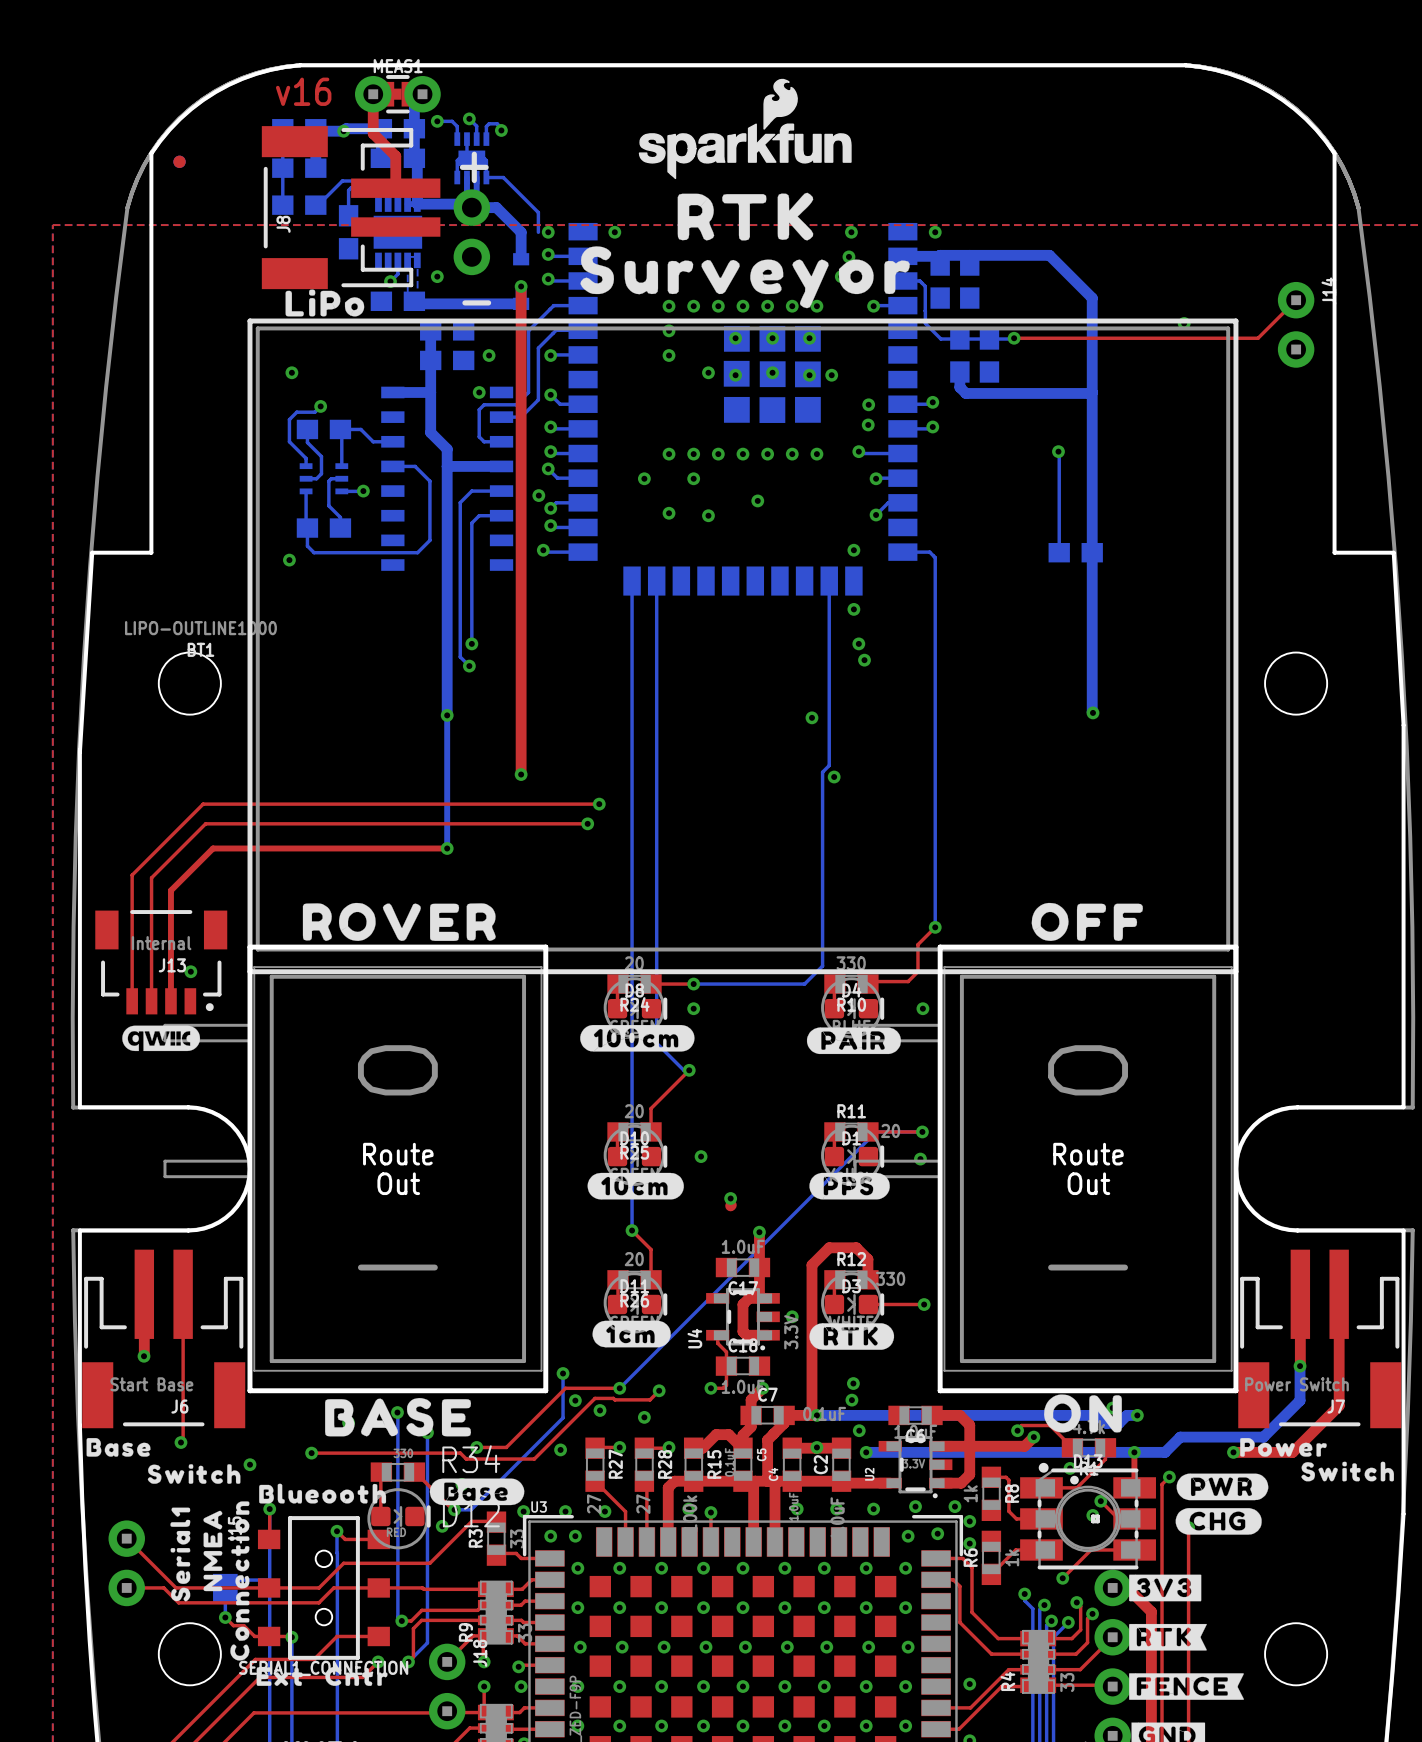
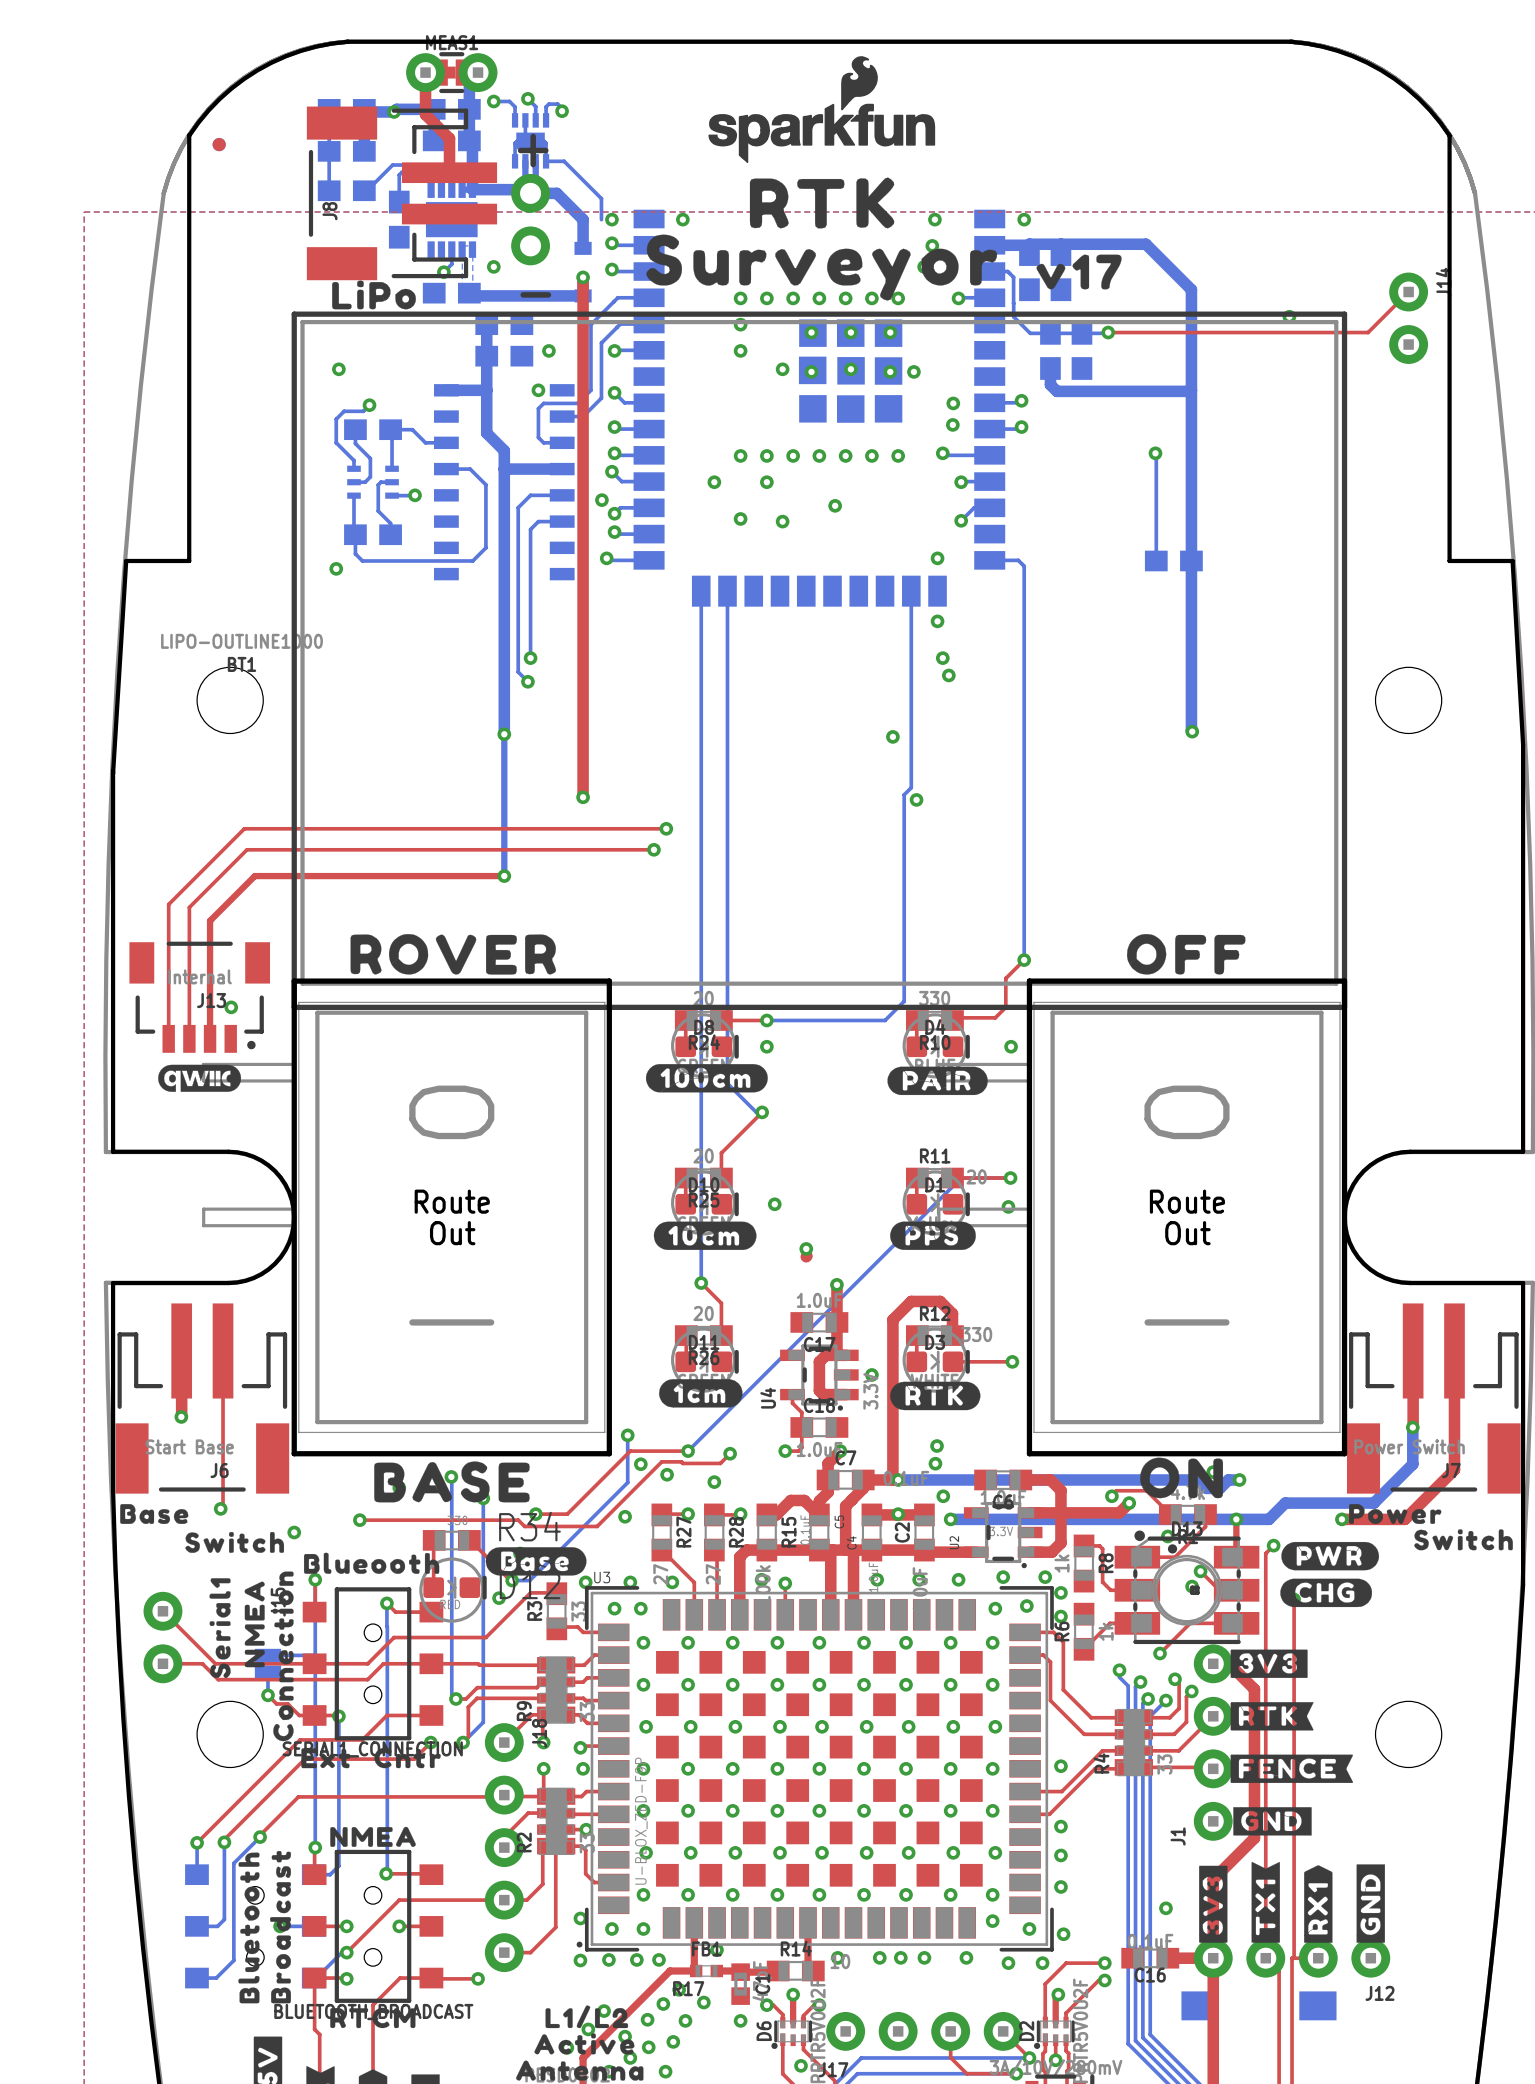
text: v16 (303, 91) -> none
drawing: none -> [1036, 254, 1122, 290]

